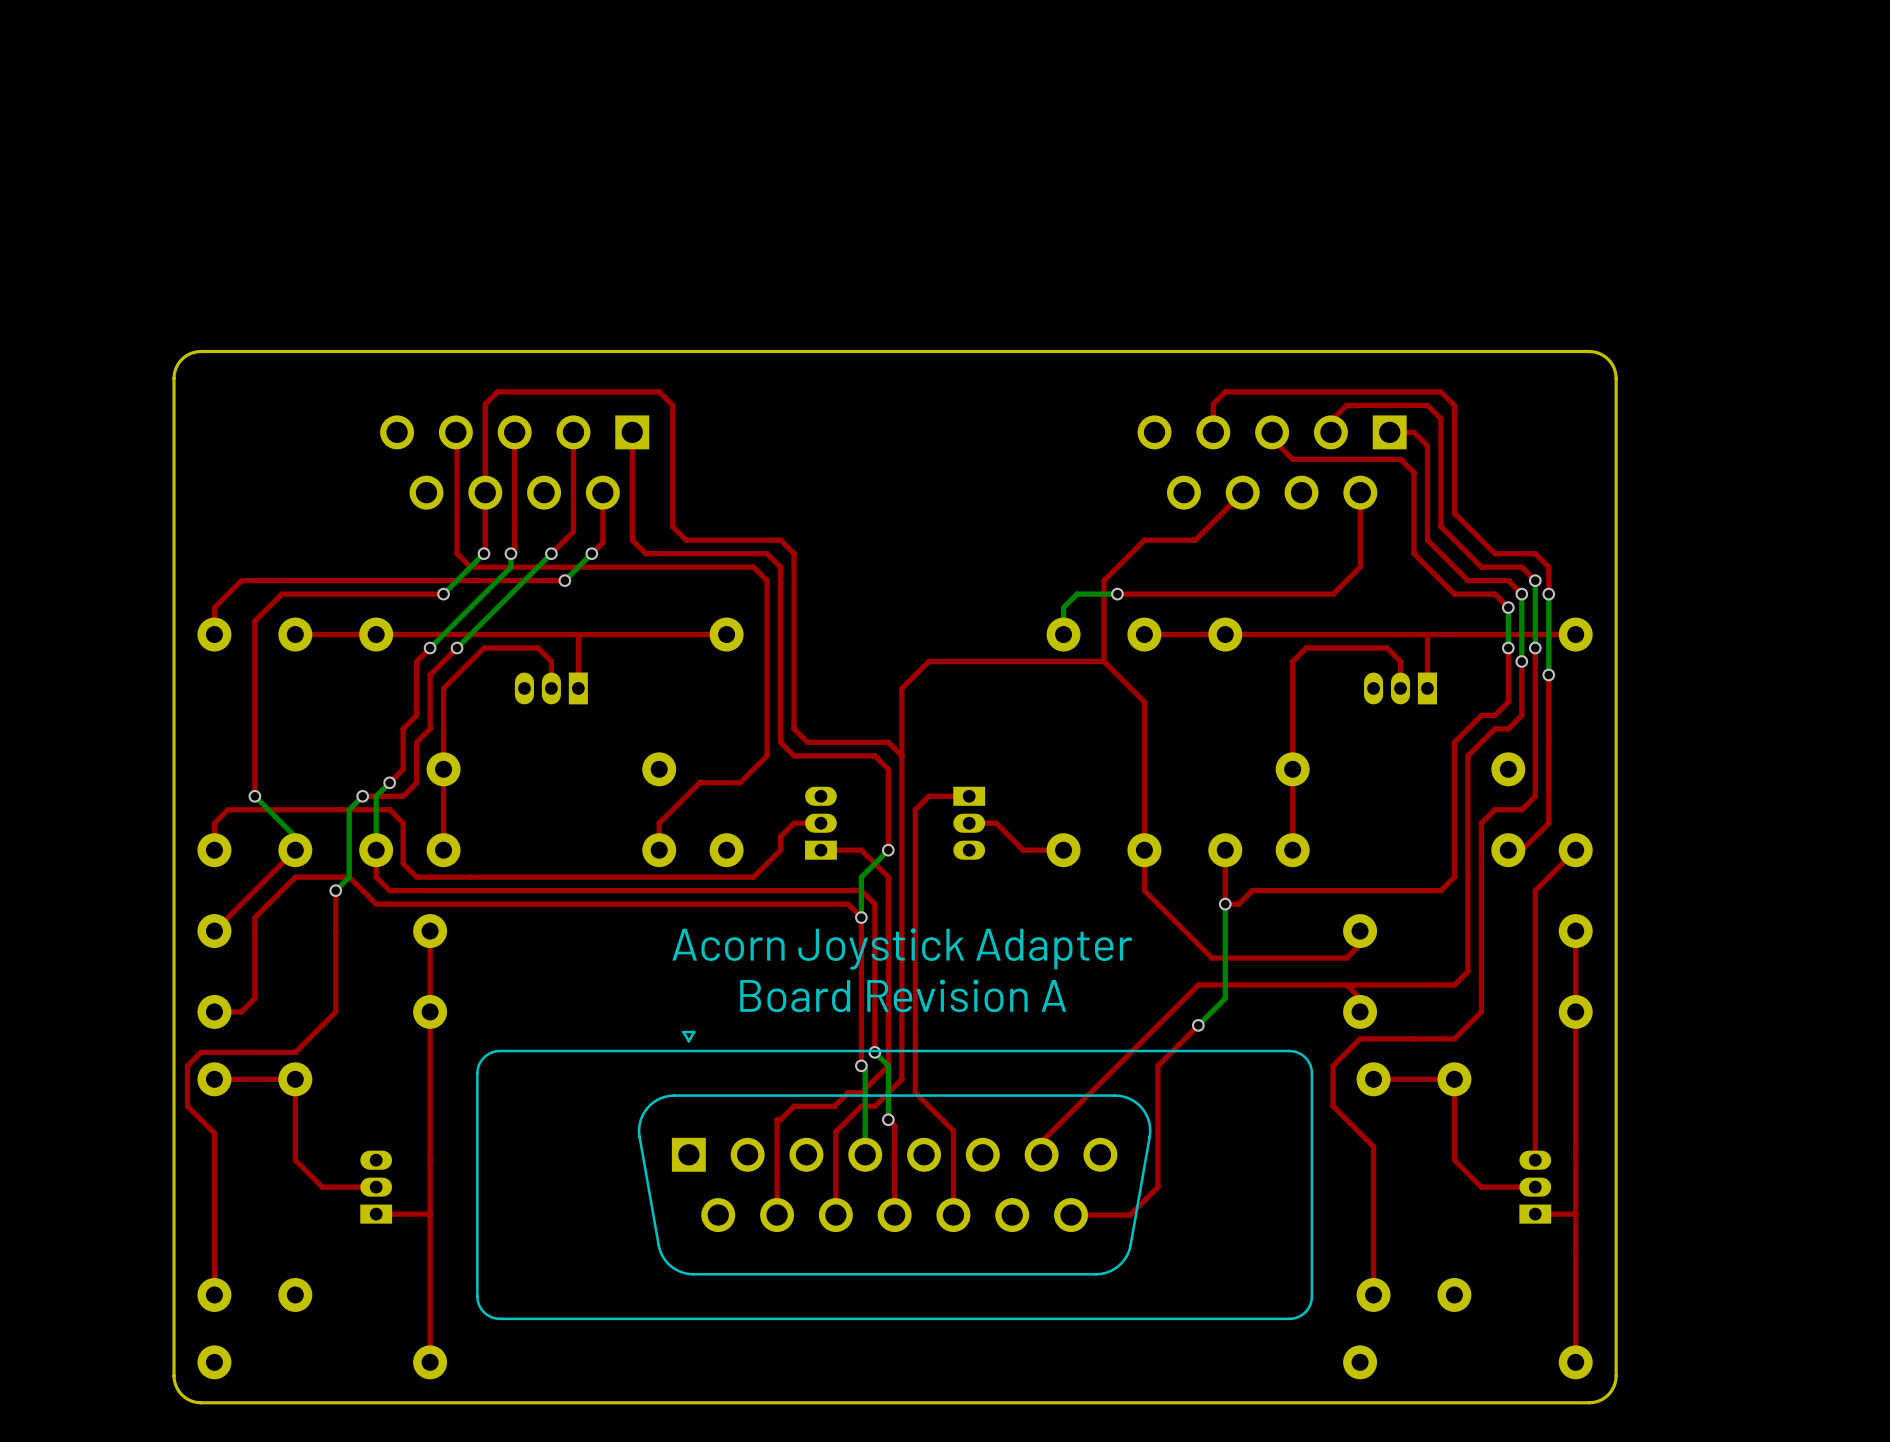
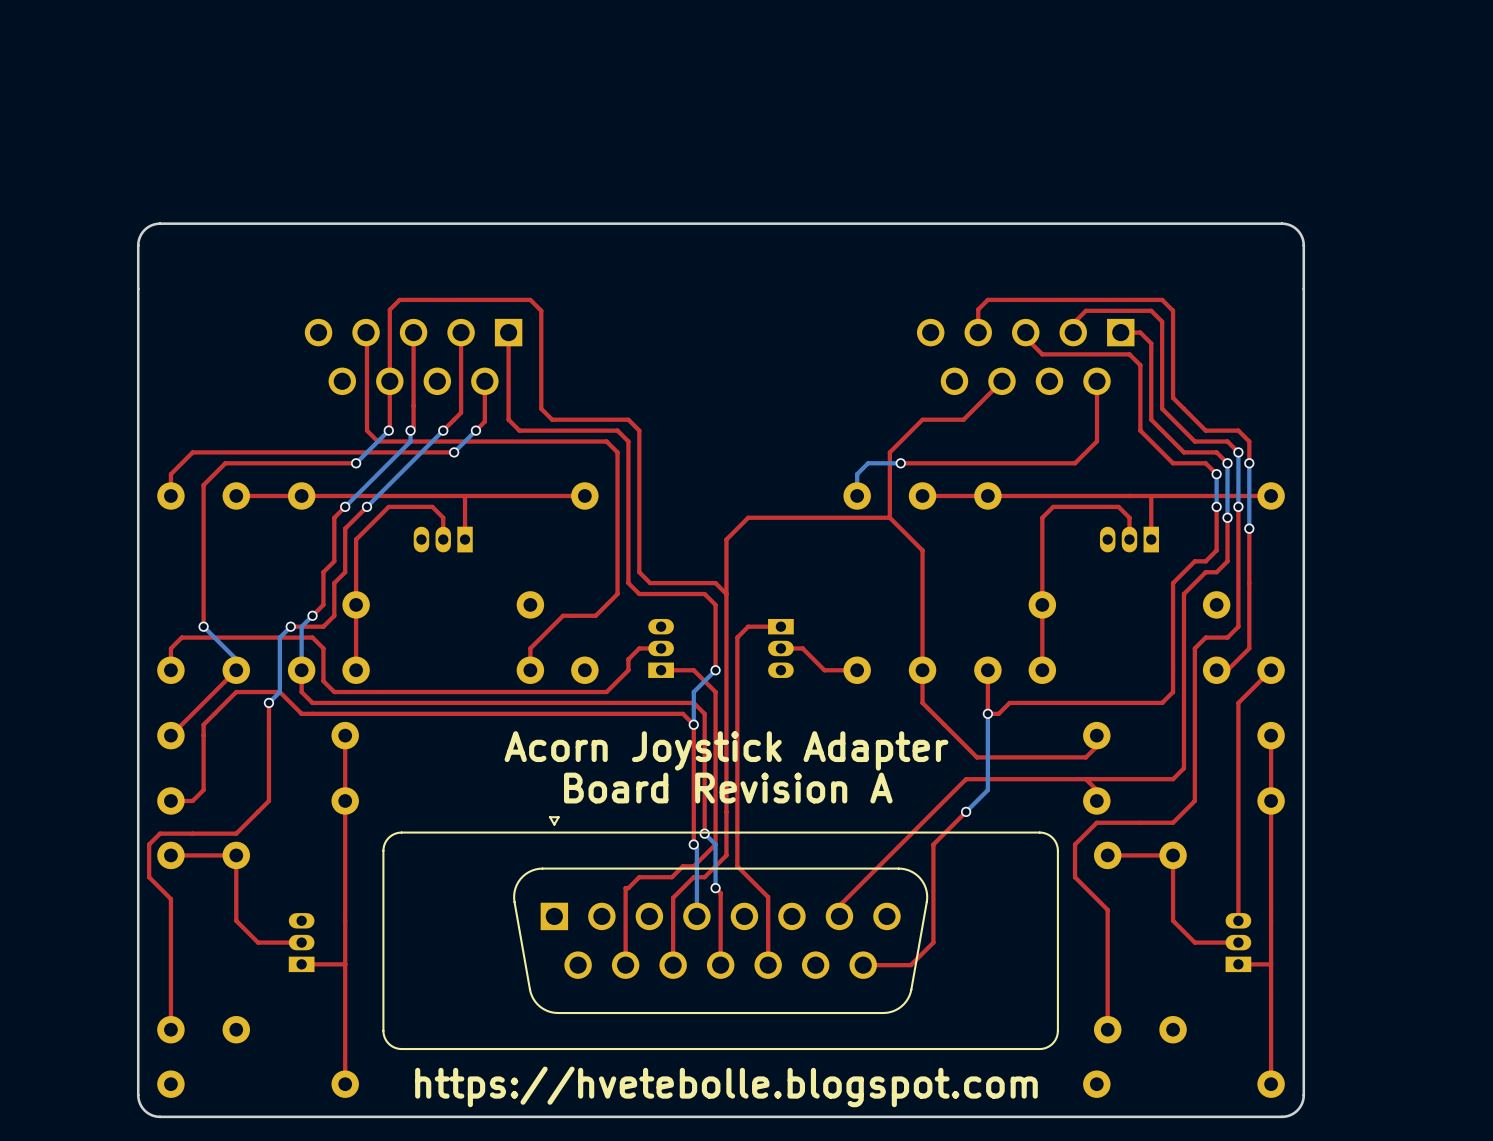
board edge: none -> (138, 245) (138, 289)
board edge: (1616, 378) (1614, 368) (1608, 359) (1599, 353) (1589, 351) (200, 351) (190, 353) (181, 359) (176, 368) (174, 378) -> (1303, 289) (1303, 239) (1295, 228) (1281, 223) (160, 223) (151, 225) (144, 230) (139, 237) (138, 245)
text: none -> https://hvetebolle.blogspot.com (726, 1086)

